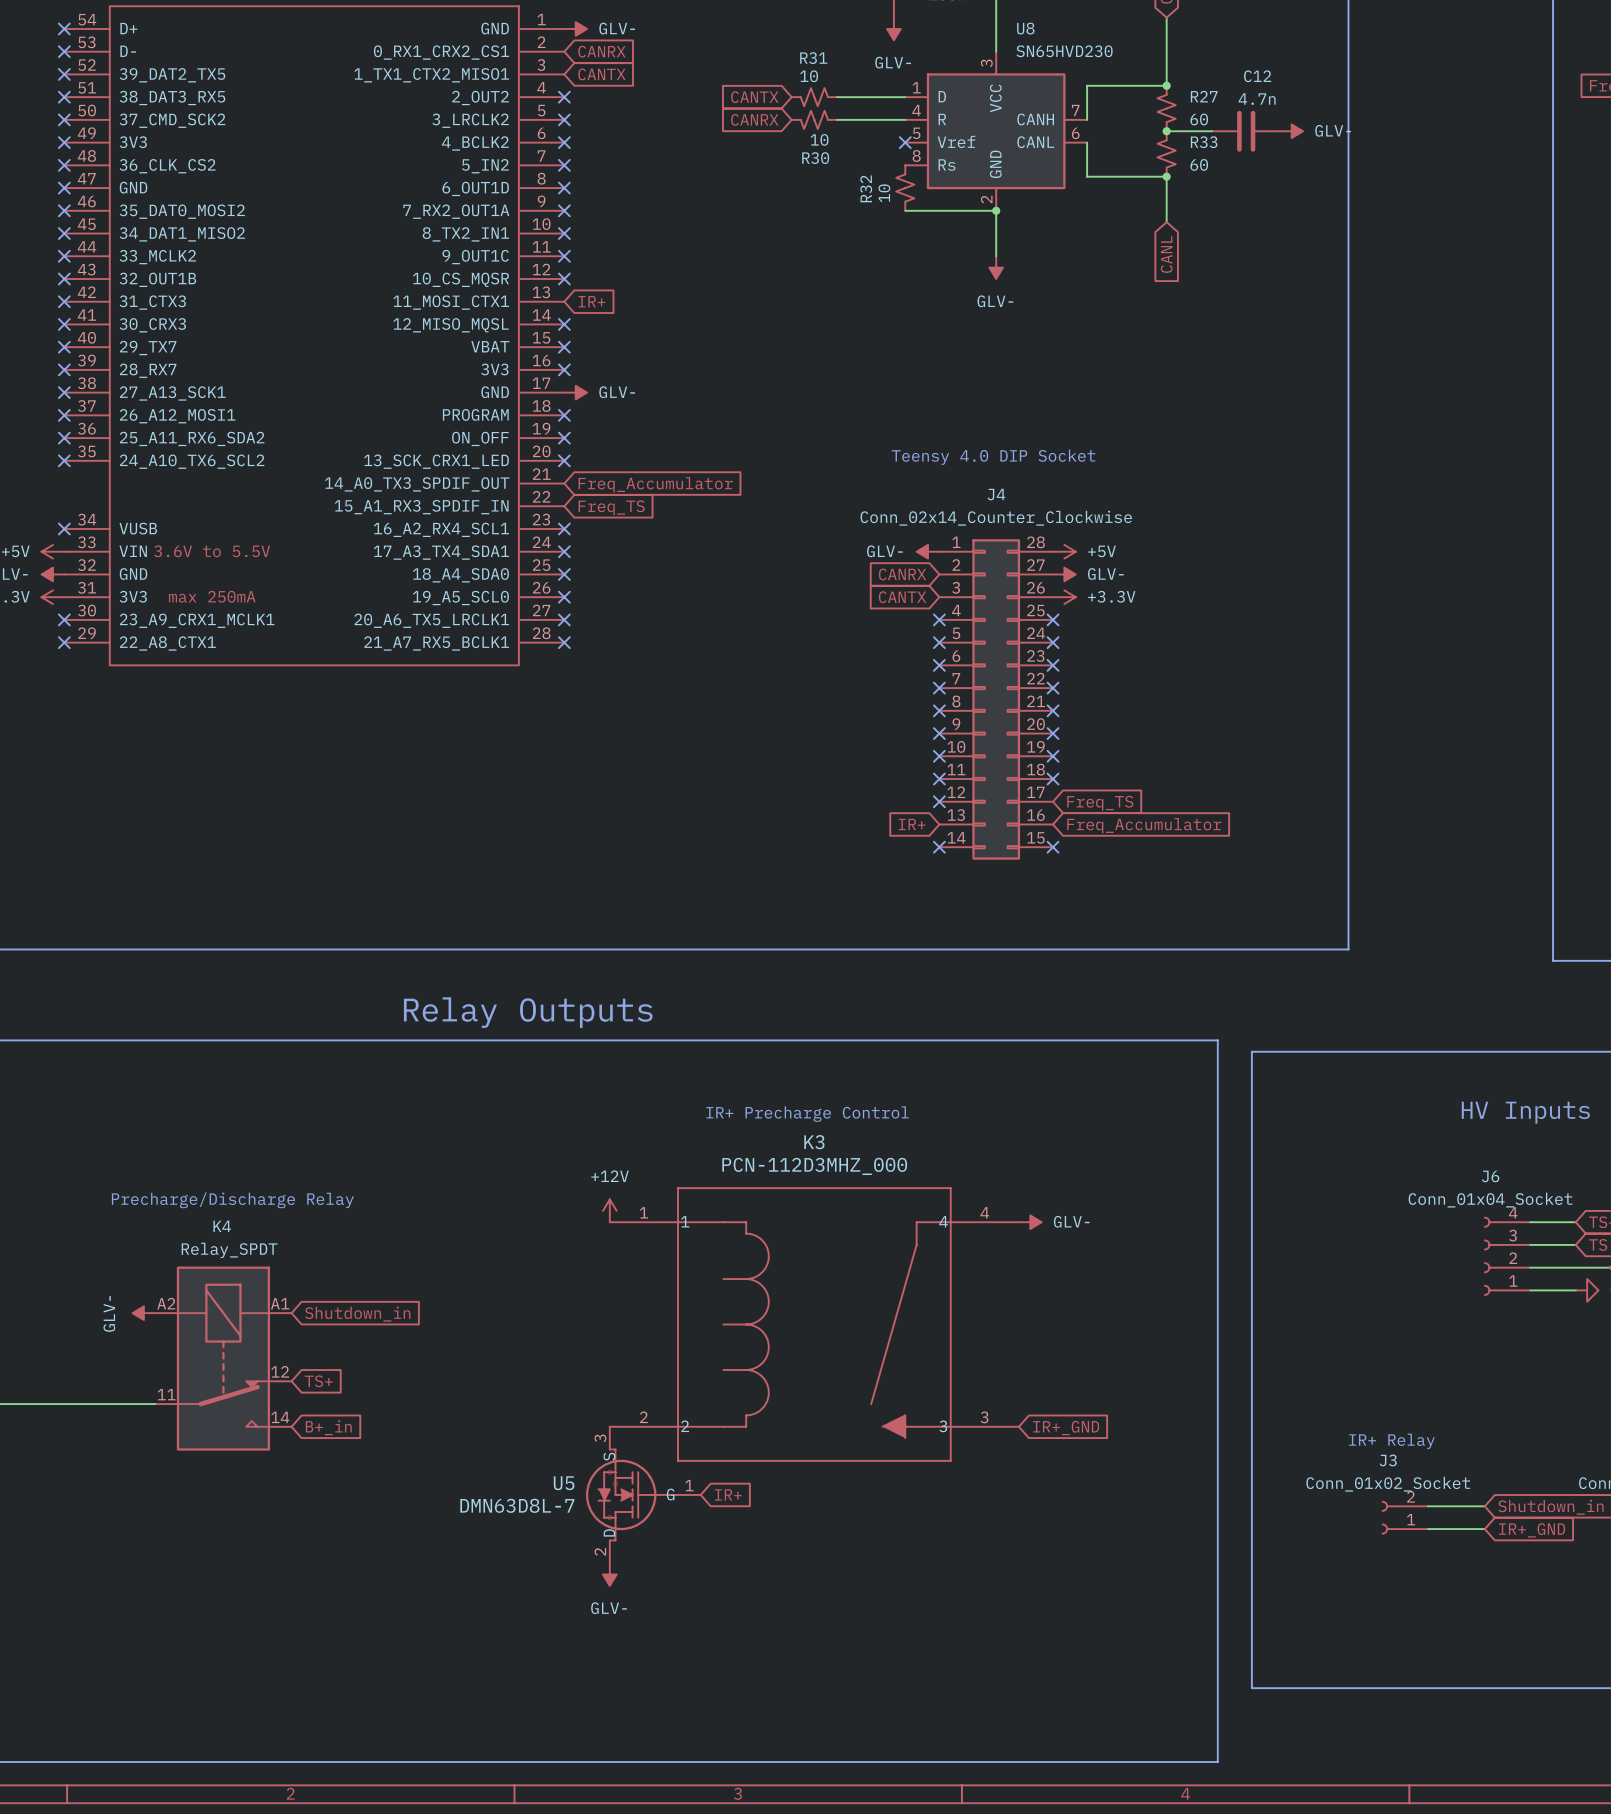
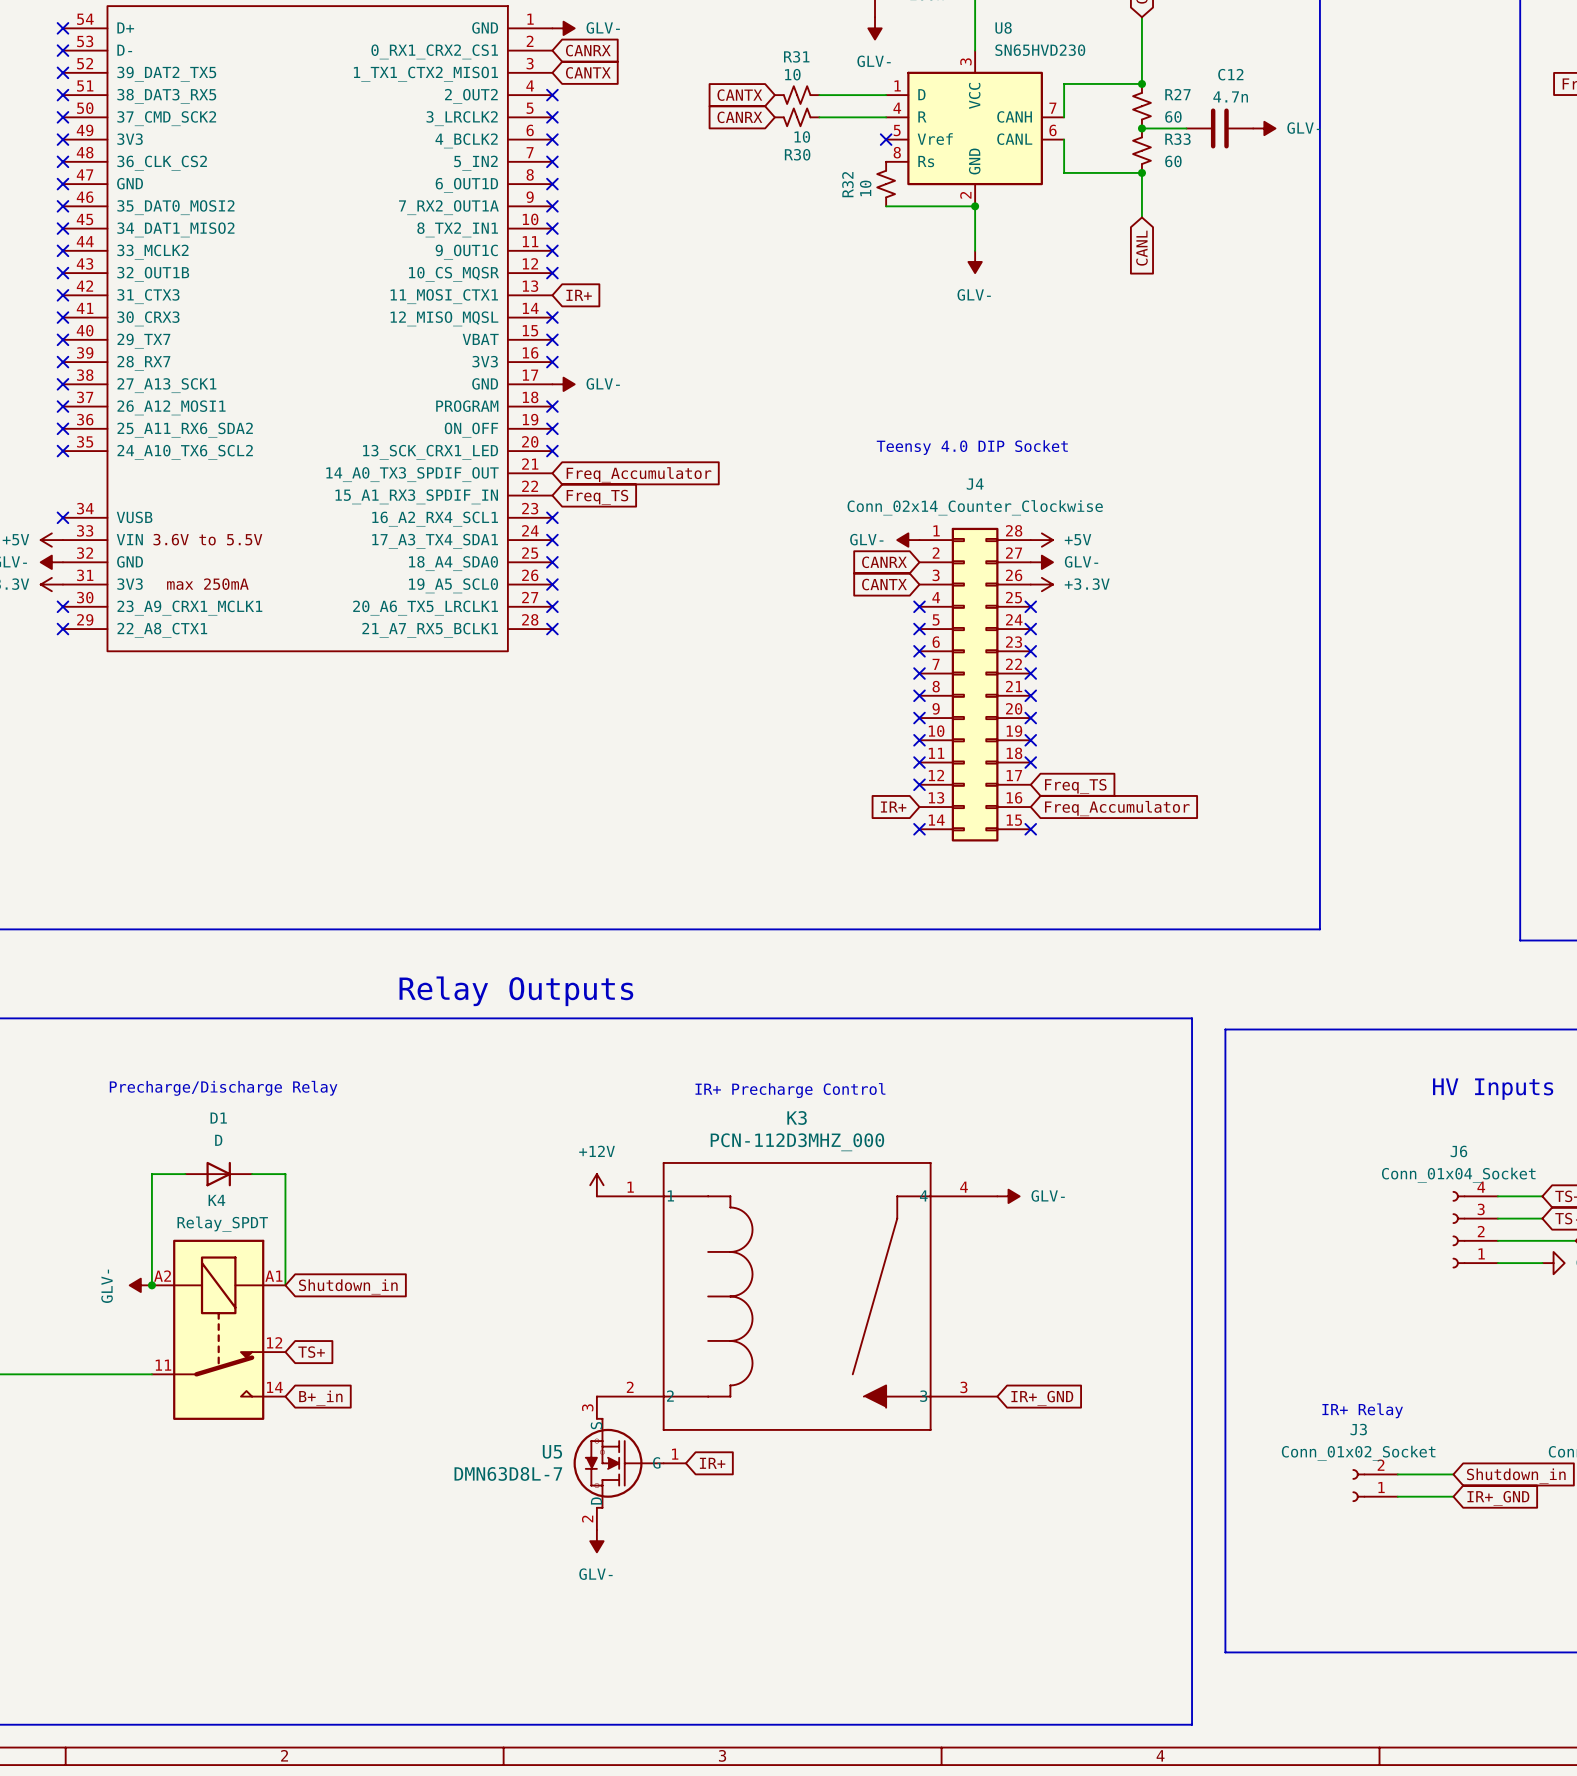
wire: none -> (185, 1174) (151, 1174) (151, 1285)
D1: none -> D (218, 1174)
wire: none -> (252, 1174) (285, 1174) (285, 1285)
text position: Precharge/Discharge Relay (232, 1200) -> Precharge/Discharge Relay (223, 1088)
junction: none -> (151, 1285)

